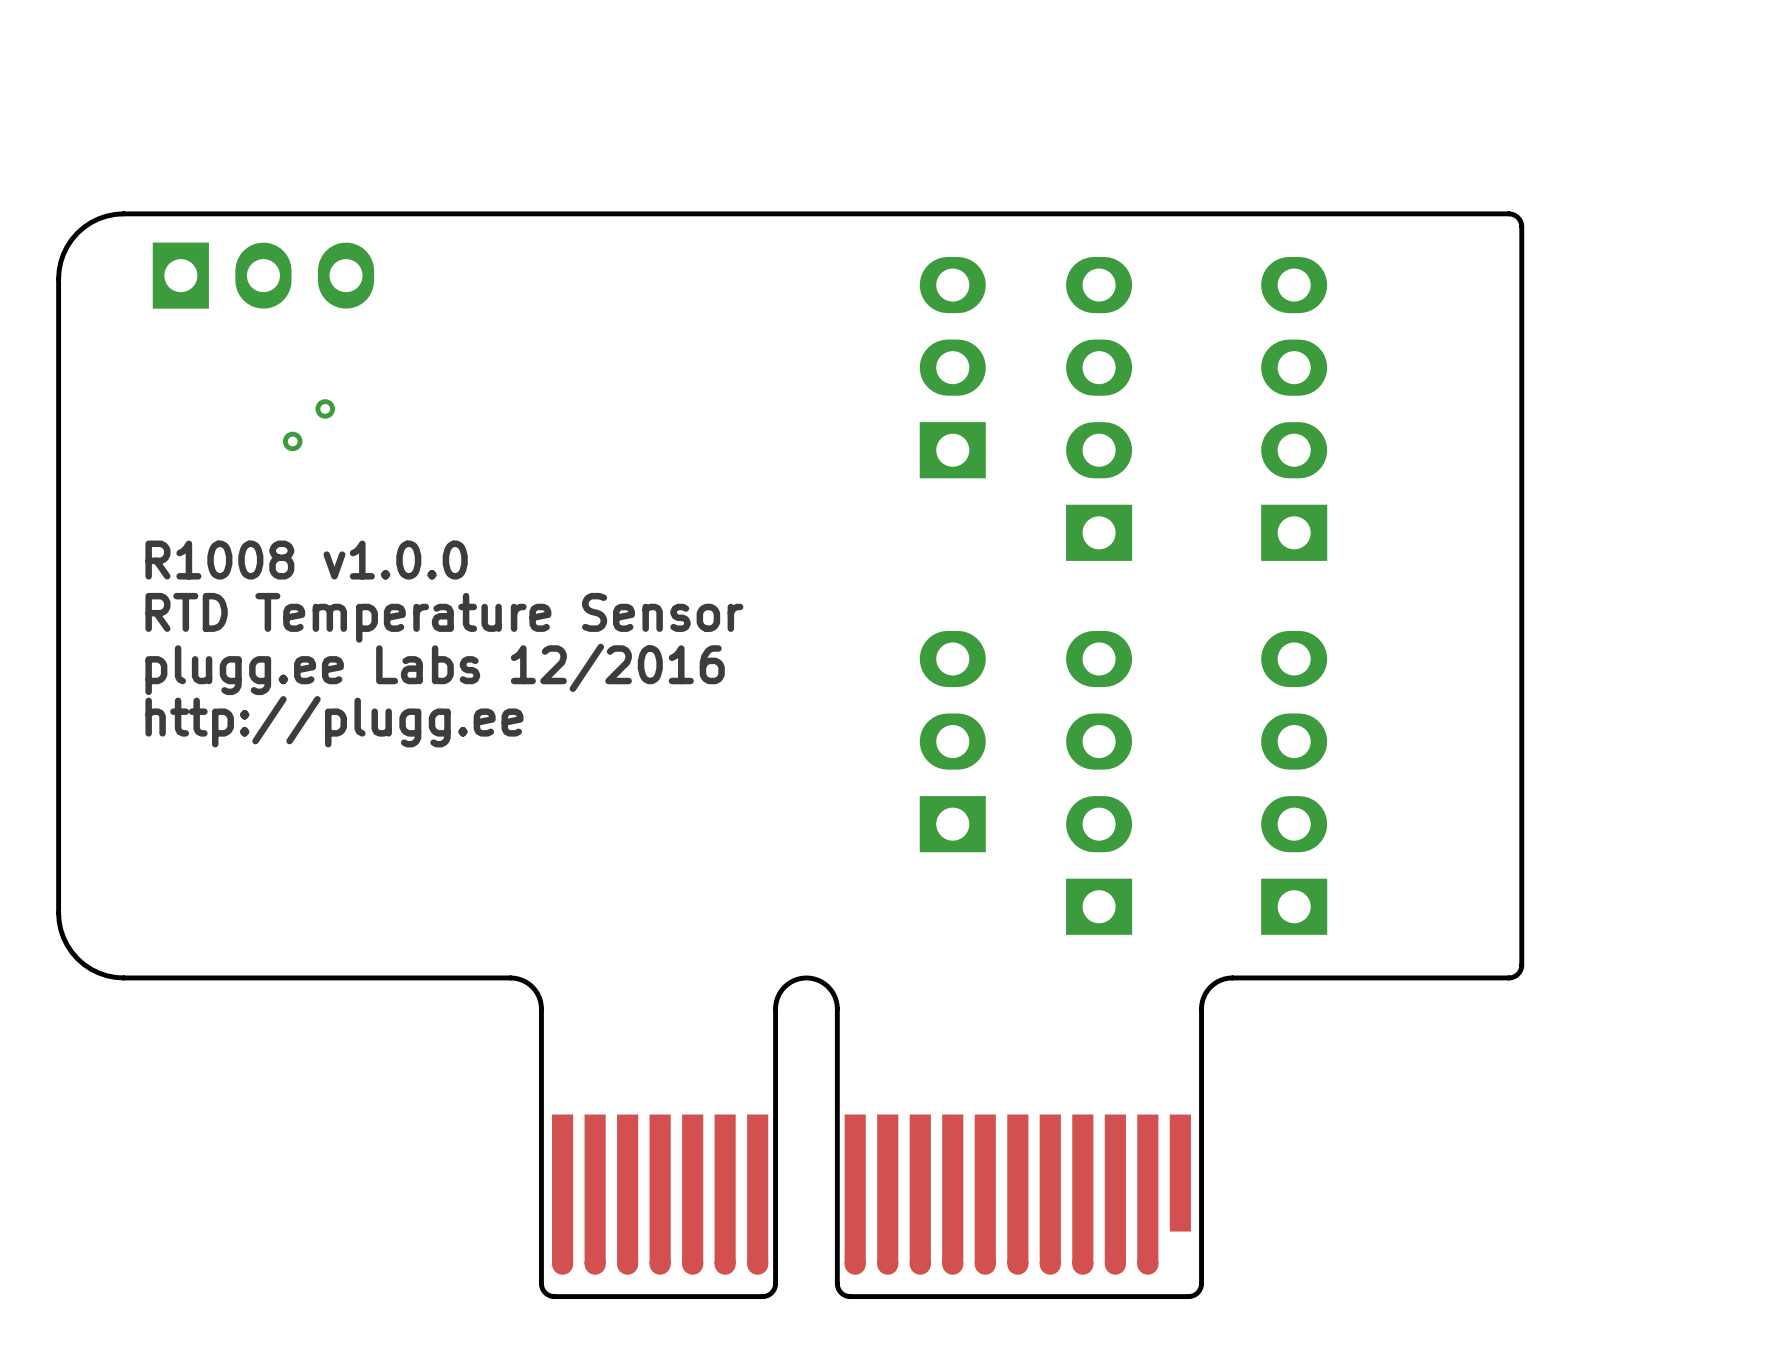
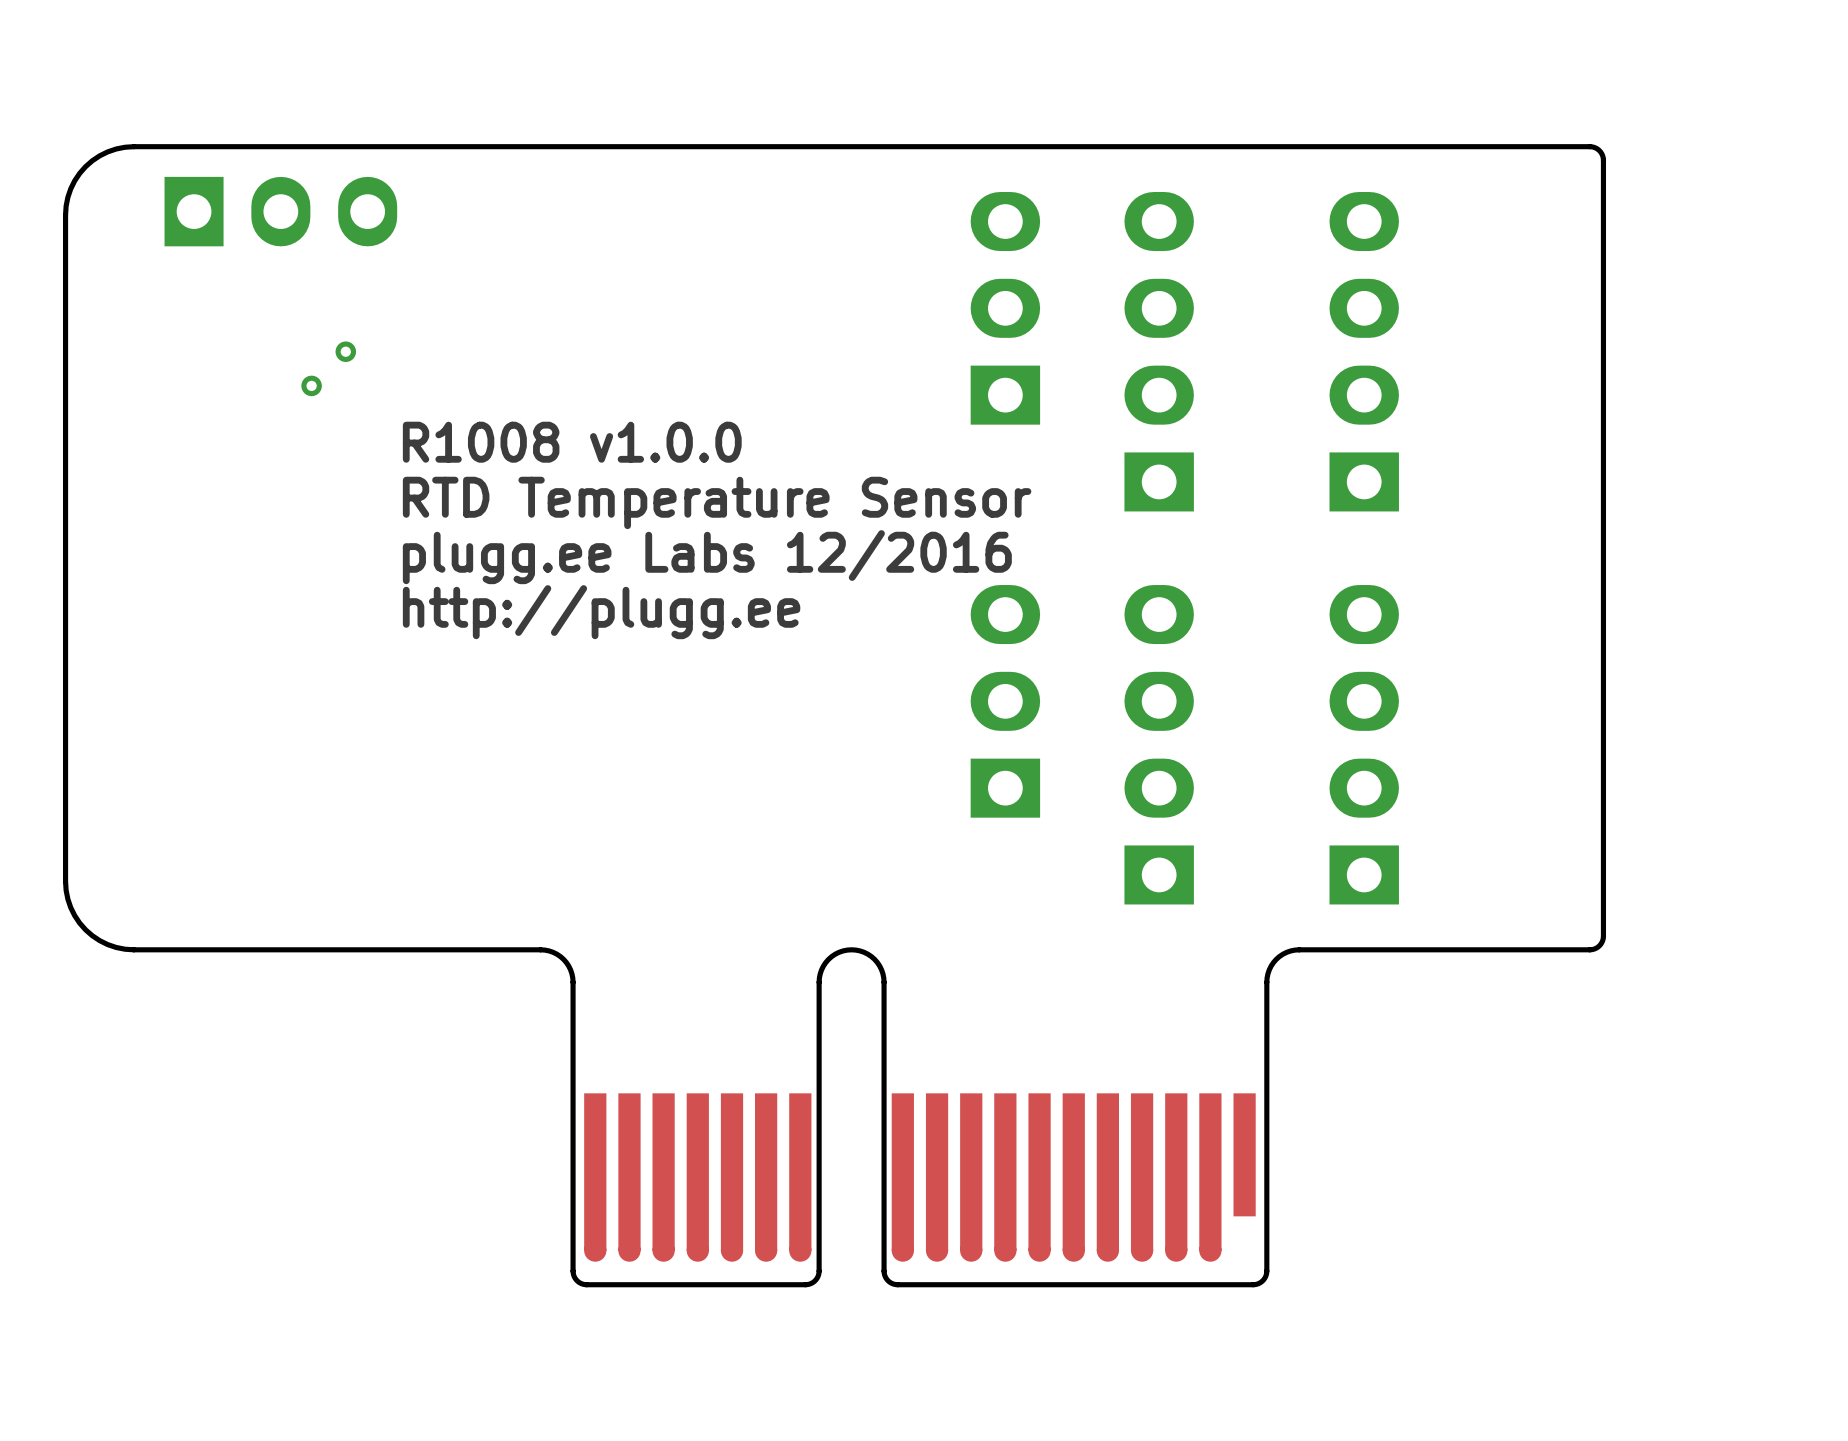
text position: R1008 v1.0.0 (306, 560) -> R1008 v1.0.0 (572, 442)
text position: RTD Temperature Sensor (444, 617) -> RTD Temperature Sensor (717, 502)
text position: plugg.ee Labs 12/2016 (435, 669) -> plugg.ee Labs 12/2016 (707, 557)
text position: http://plugg.ee (334, 721) -> http://plugg.ee (601, 612)

